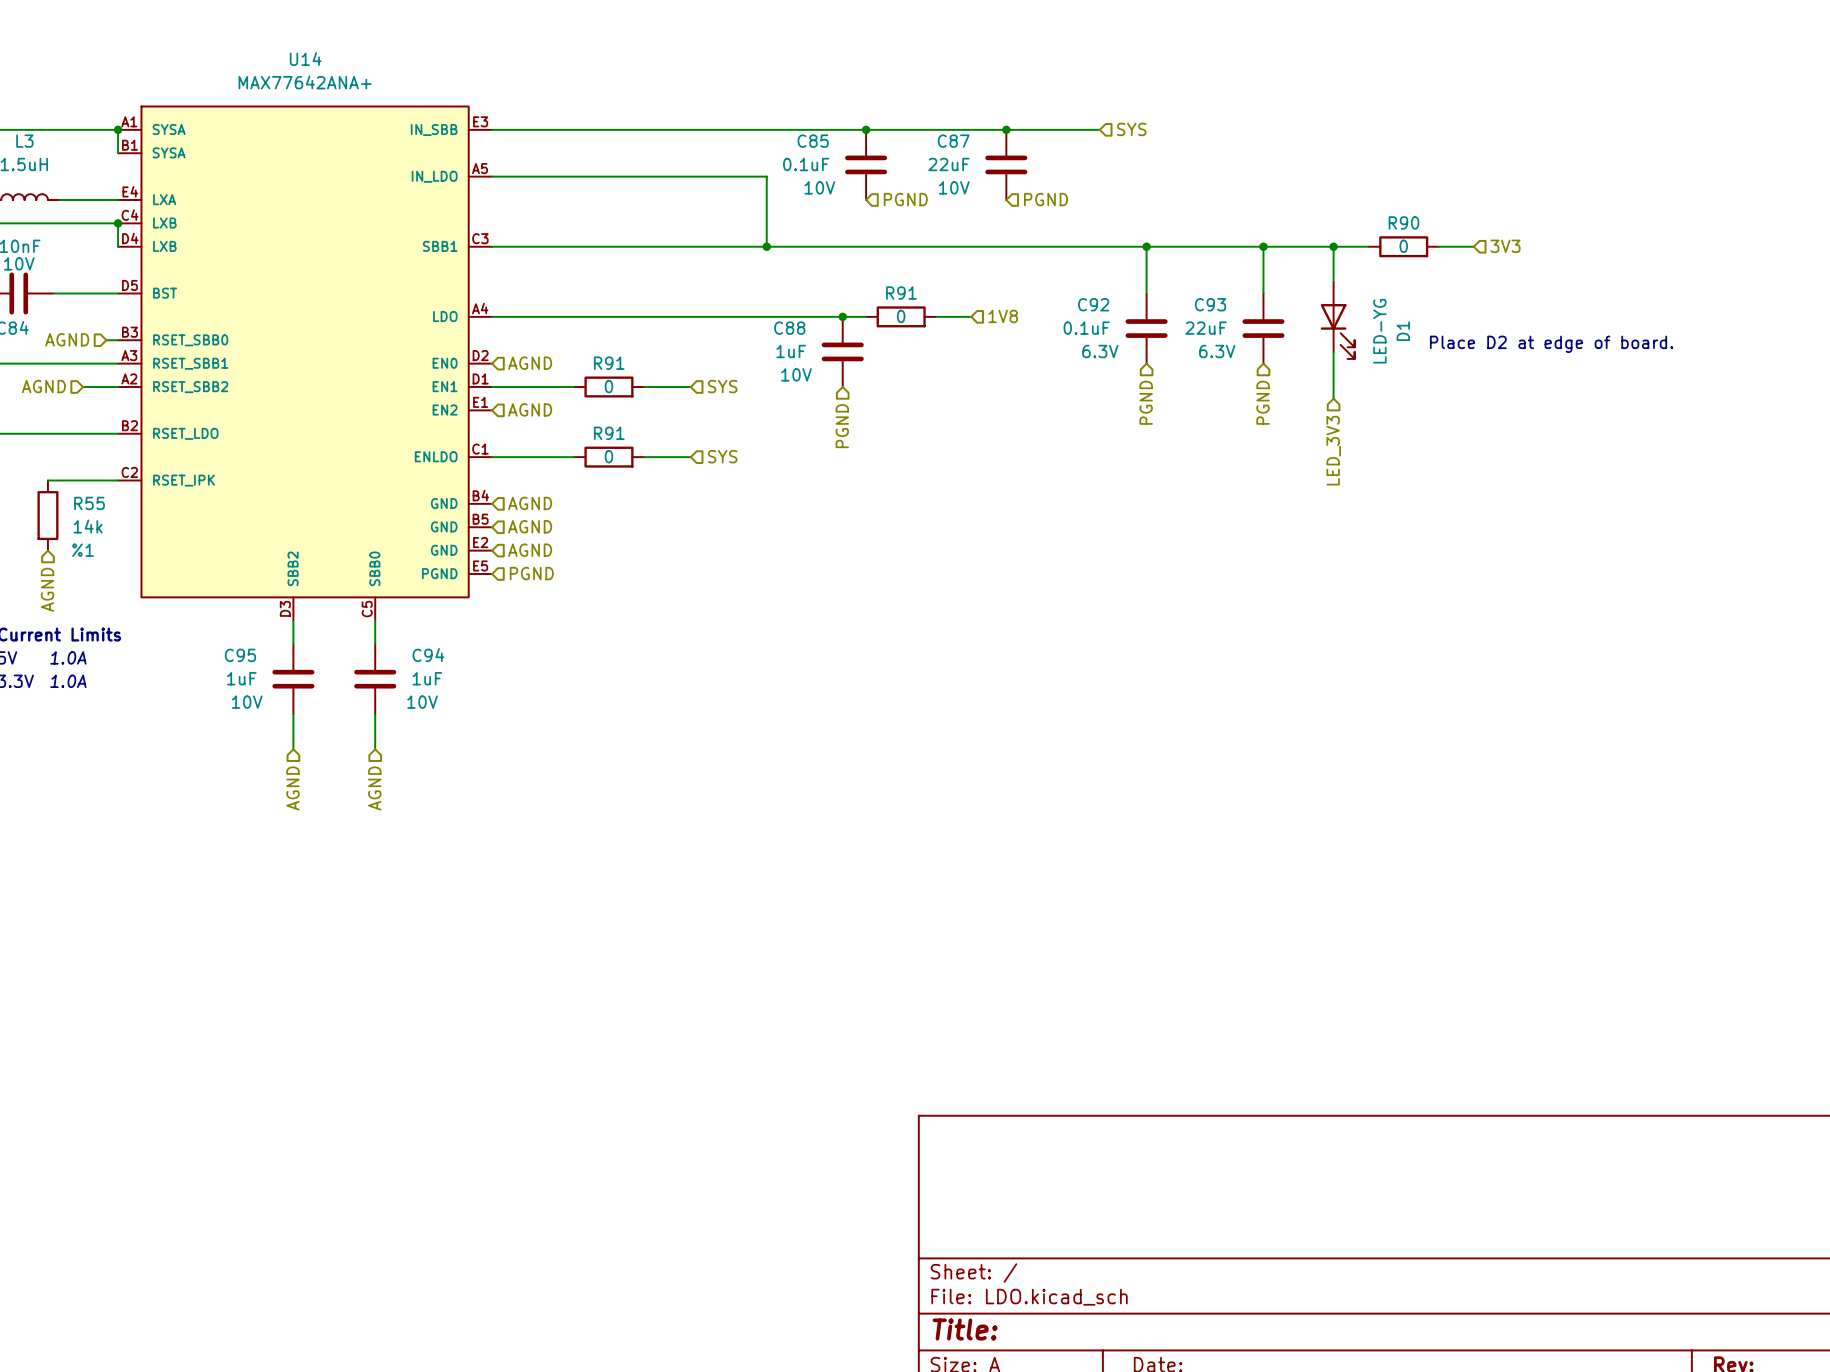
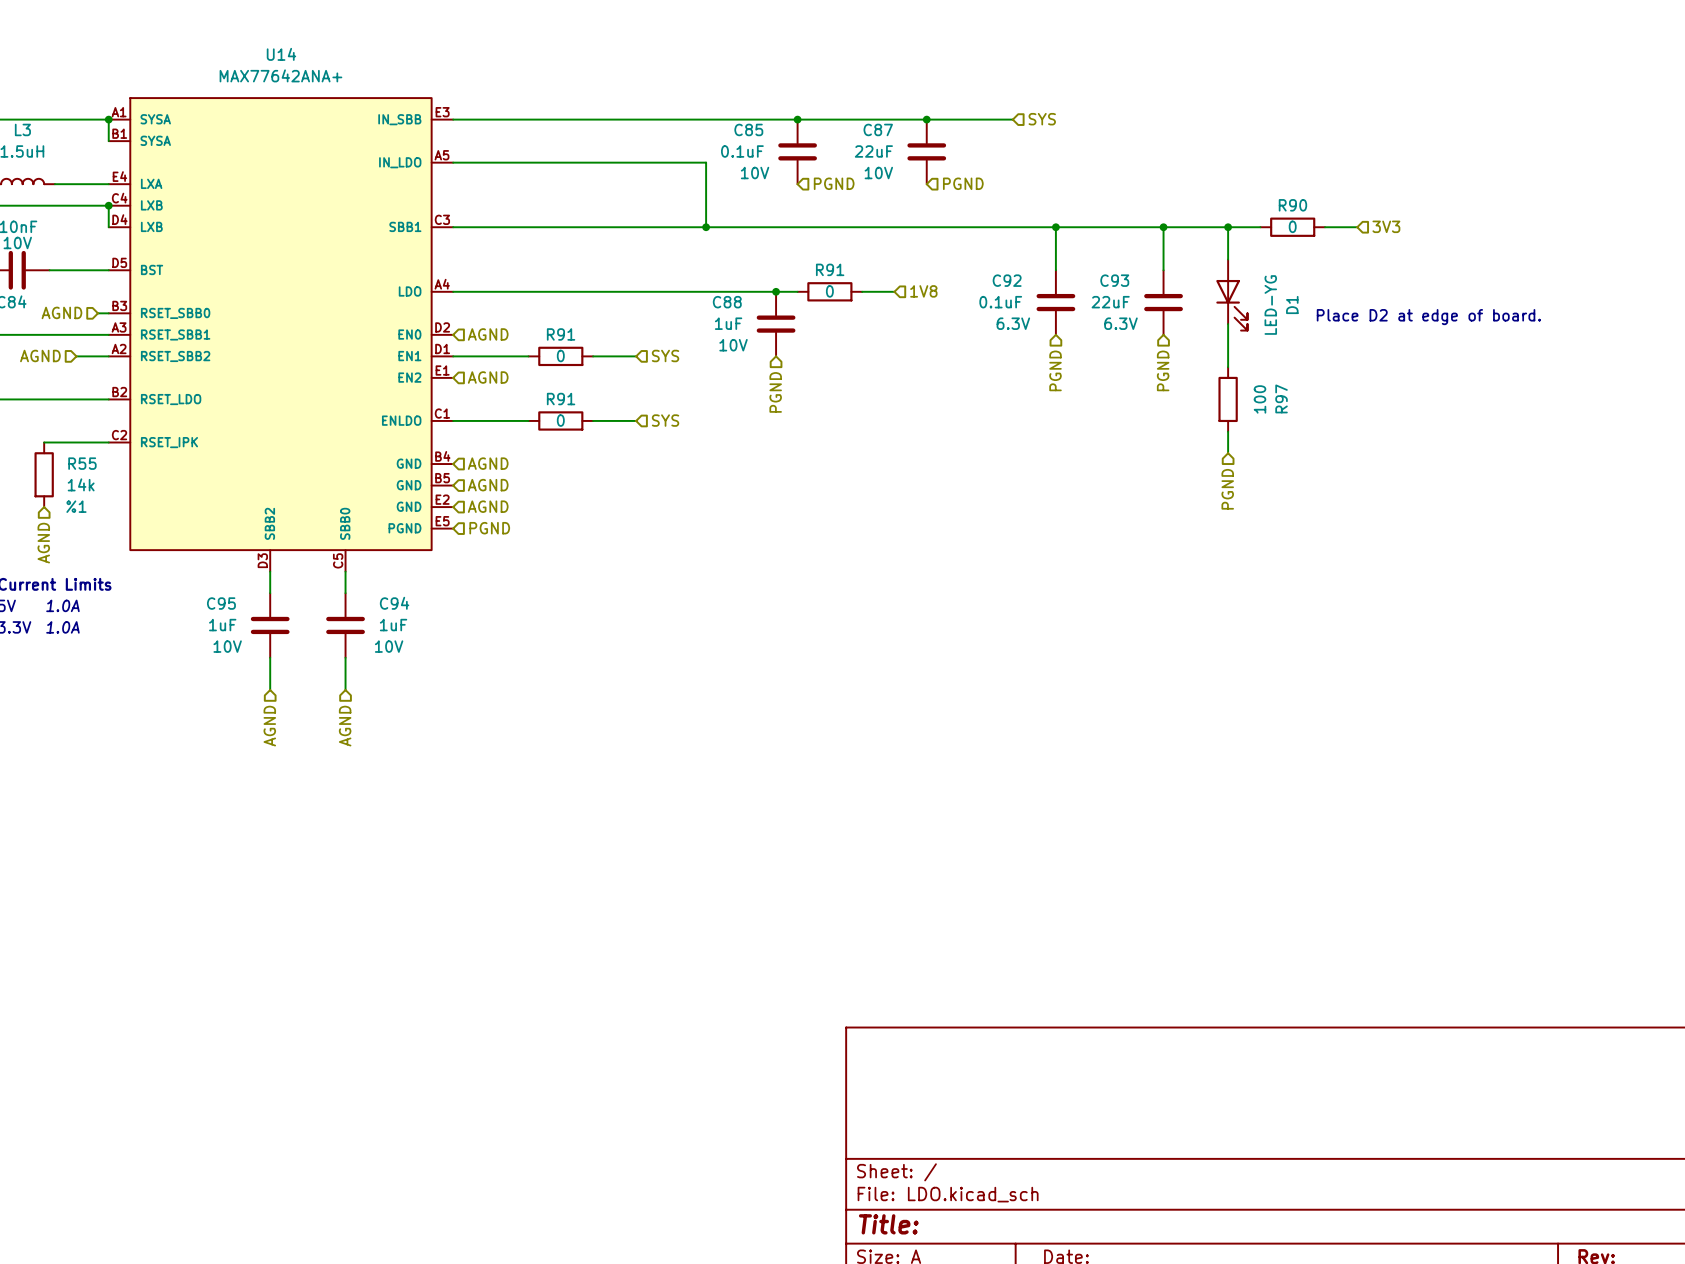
R97: none -> 100 (1228, 399)
hierarchical label: LED_3V3 (1333, 450) -> none
wire: none -> (1228, 431) (1228, 453)
hierarchical label: none -> PGND (1227, 489)

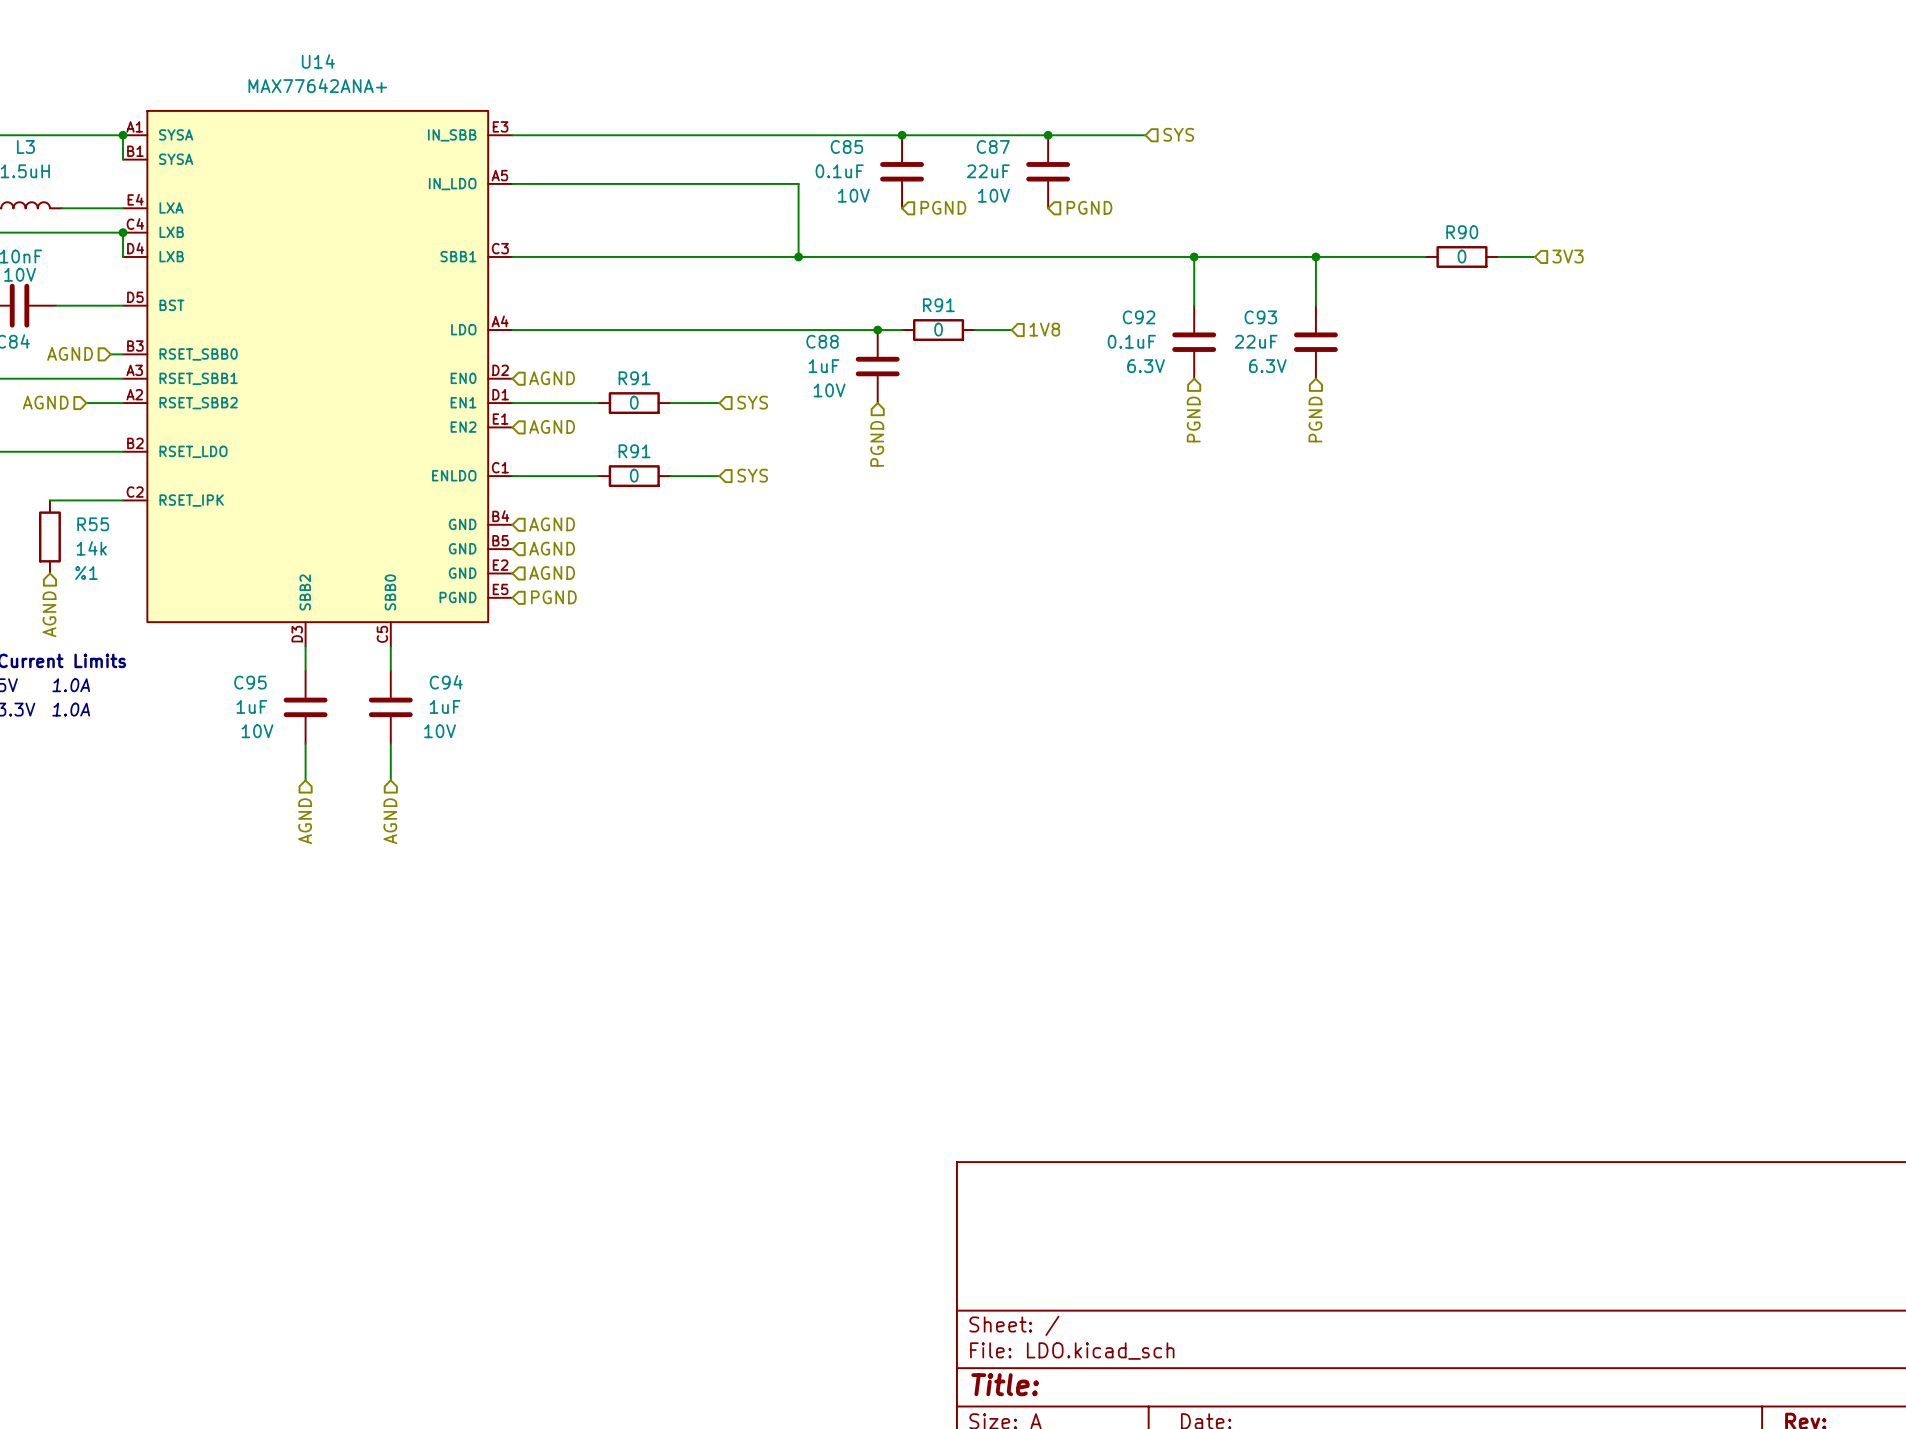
wire: (1228, 227) (1228, 259) -> none
junction: (1228, 227) -> none
D1: LED-YG (1231, 295) -> none
text: Place D2 at edge of board. (1428, 317) -> none
wire: (1228, 324) (1228, 367) -> none
R97: 100 (1228, 399) -> none
wire: (1228, 431) (1228, 453) -> none
hierarchical label: PGND (1227, 489) -> none

